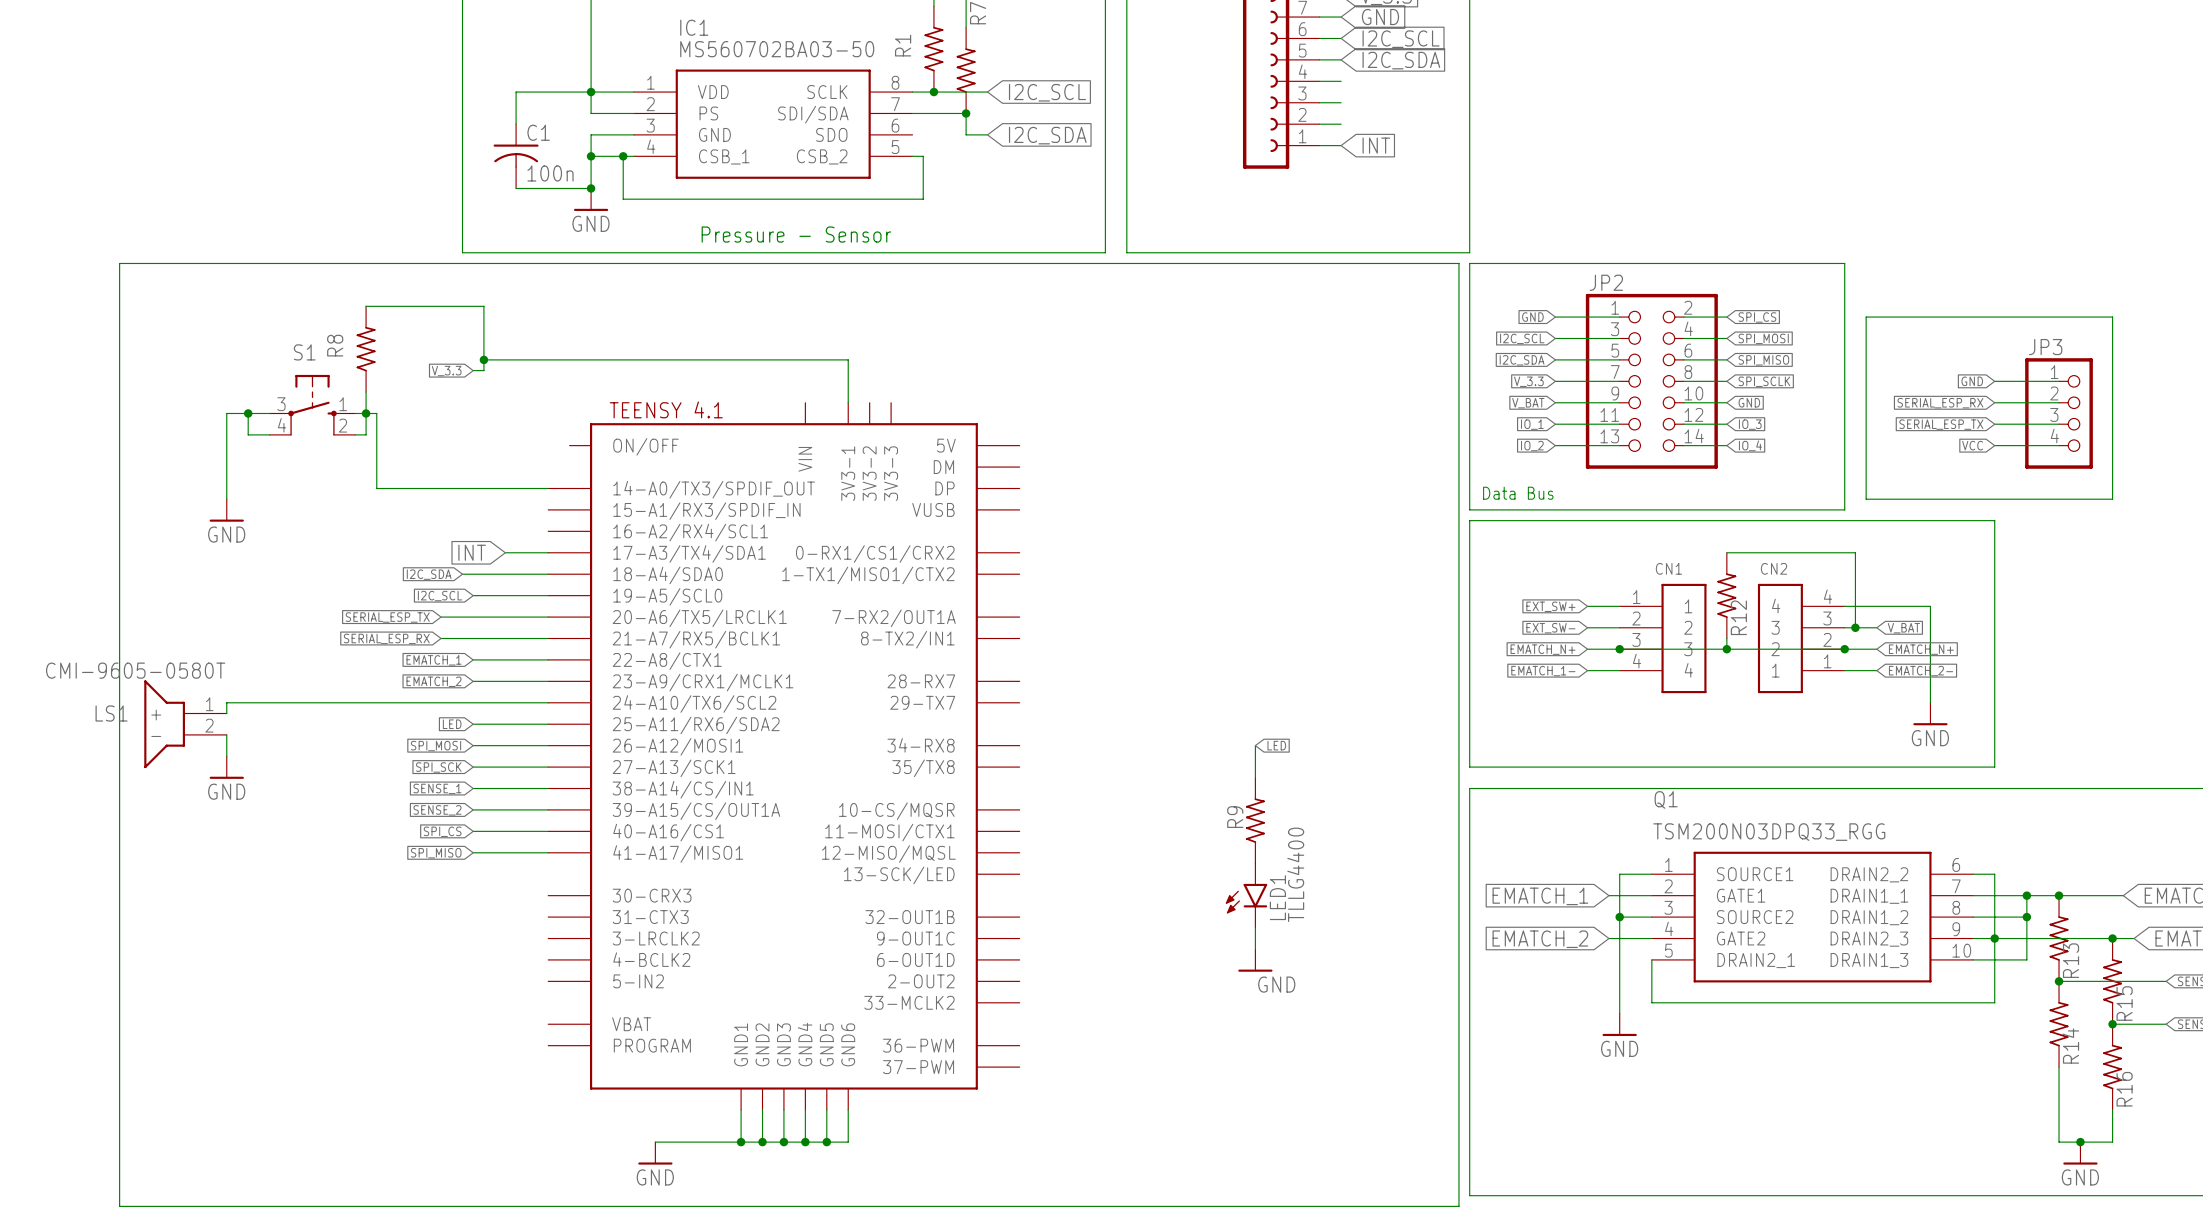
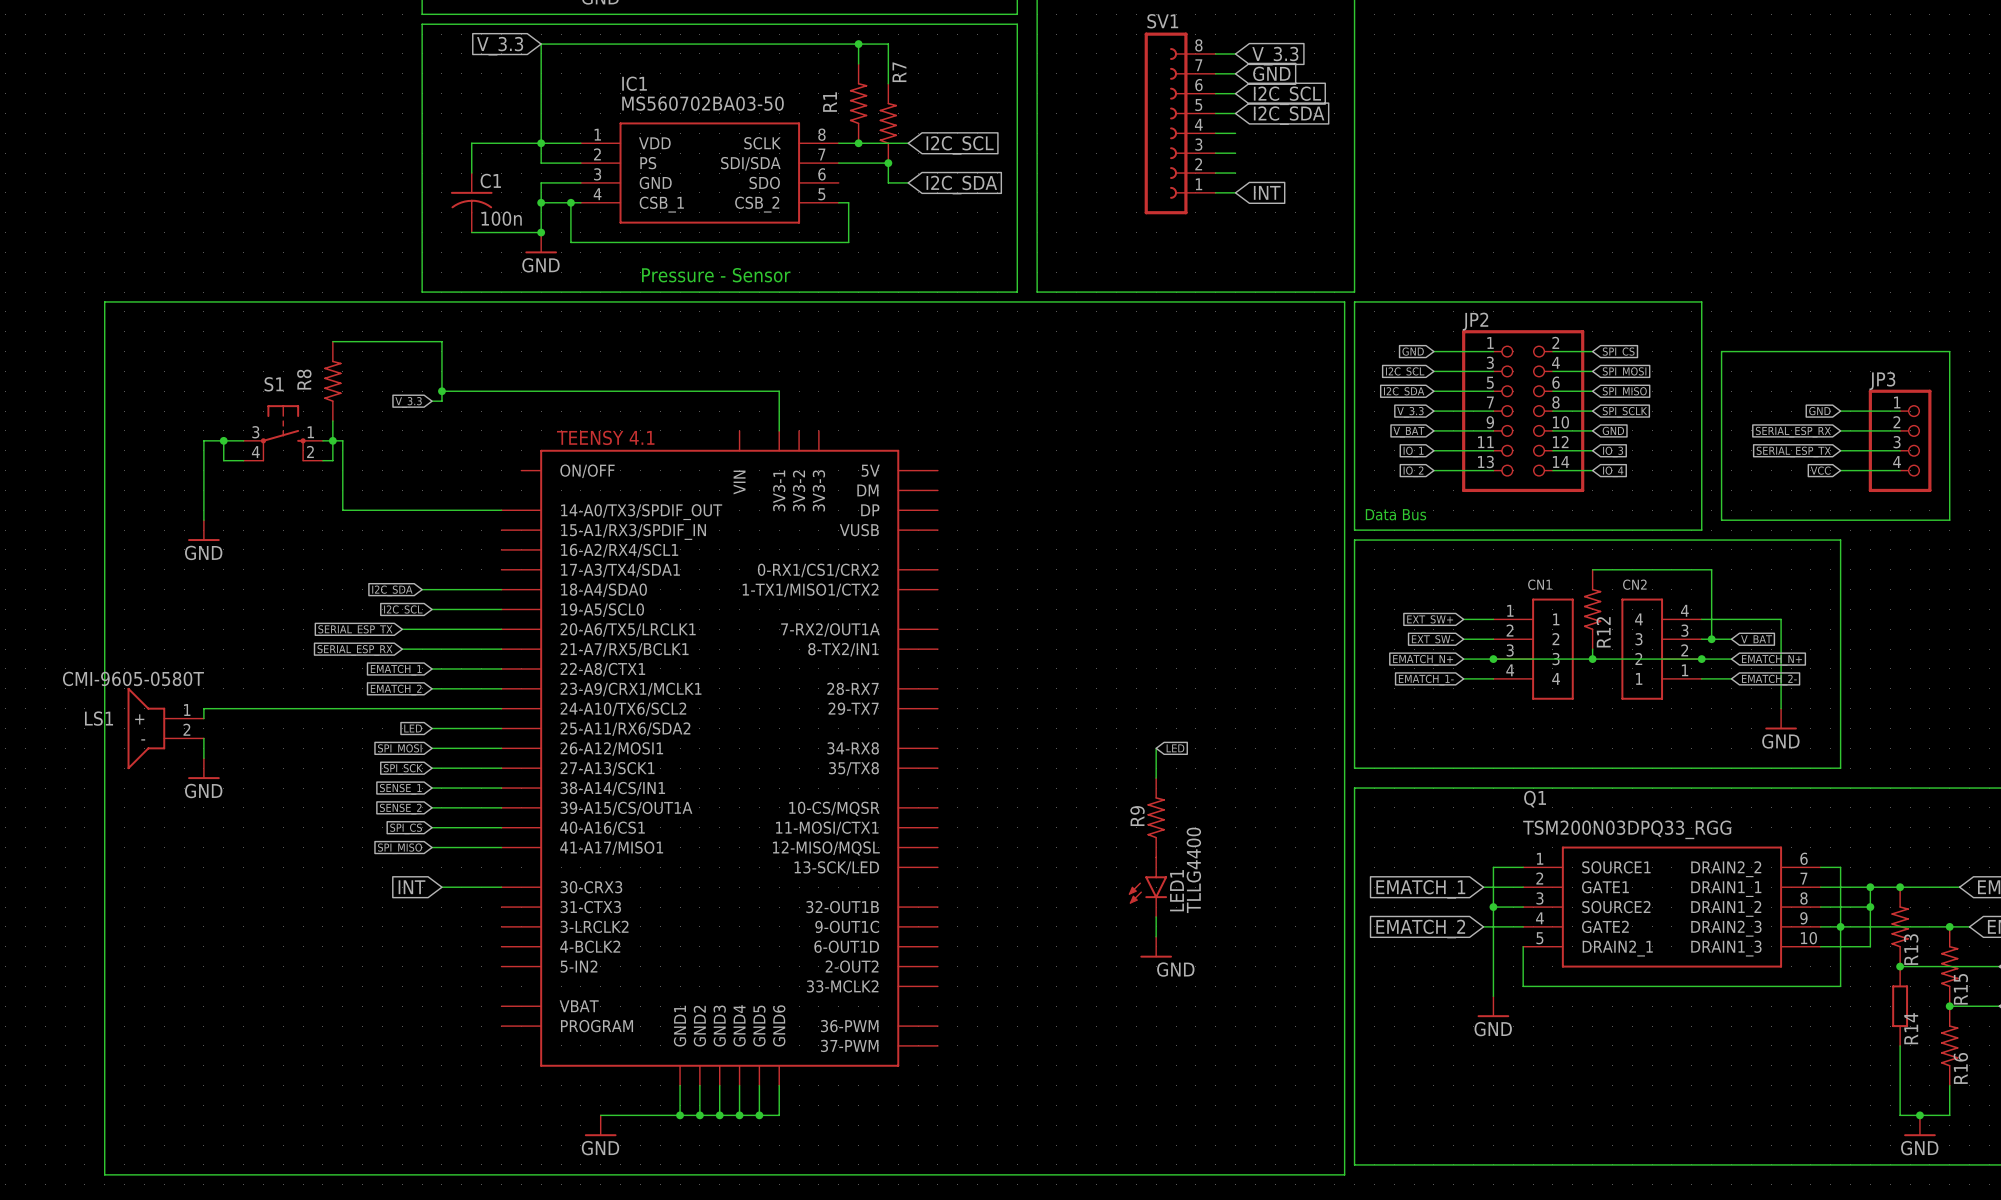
global label: INT (472, 552) -> none
wire: (505, 552) (548, 552) -> none
global label: none -> INT (412, 887)
wire: none -> (441, 887) (501, 887)
R14 symbol: [2049, 981, 2069, 1068] -> [1892, 966, 1909, 1046]

